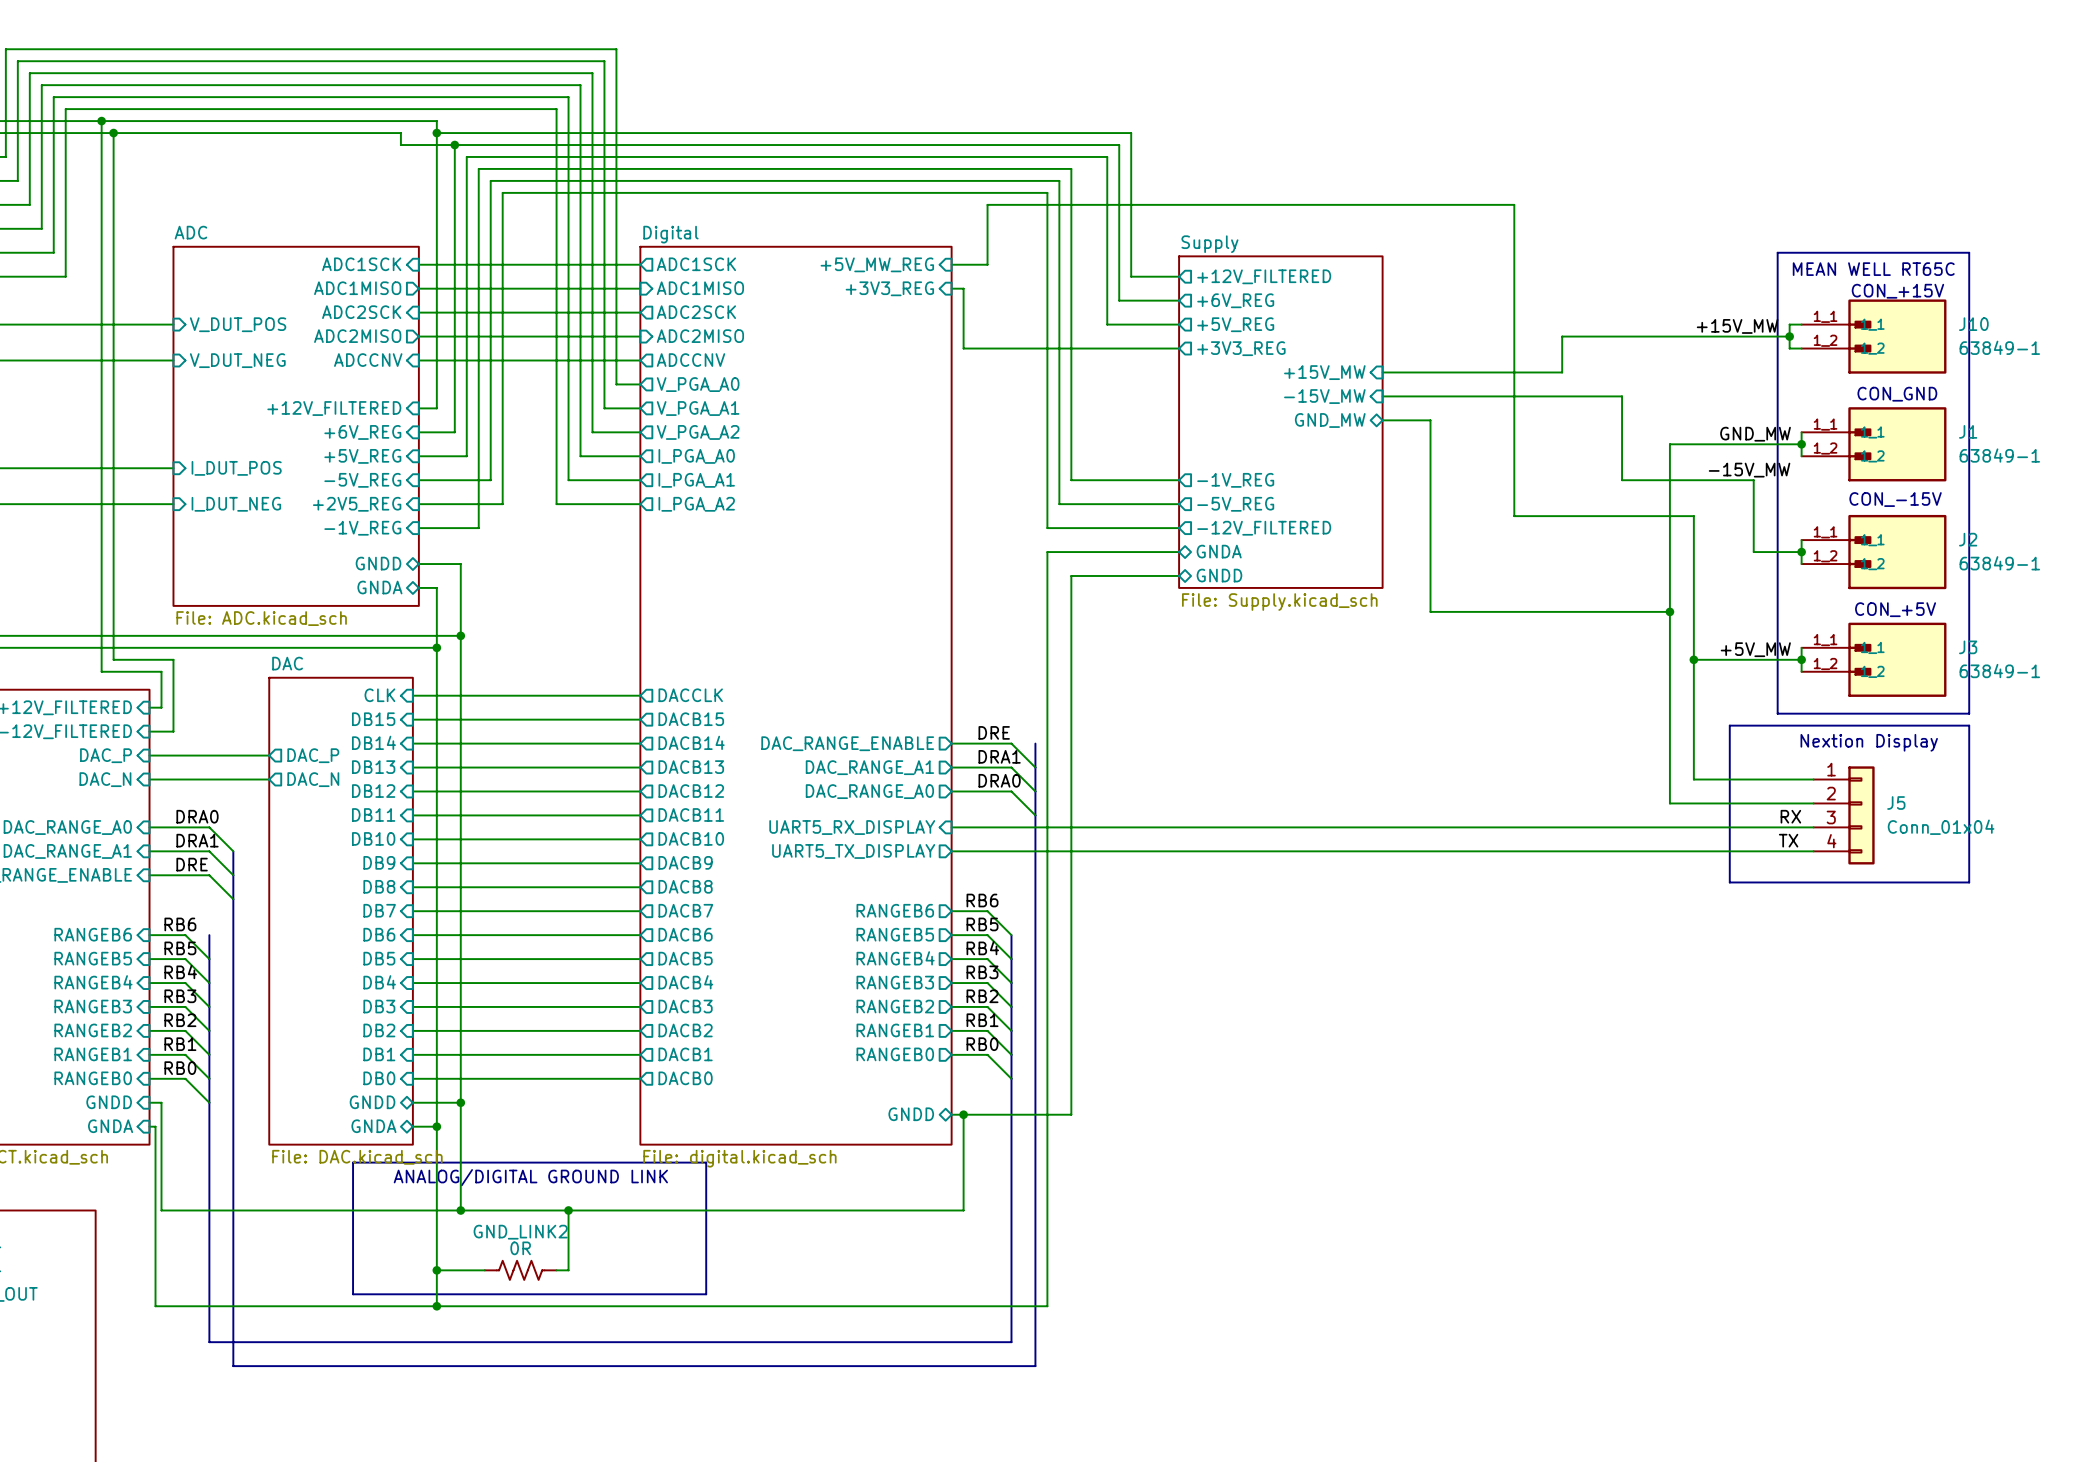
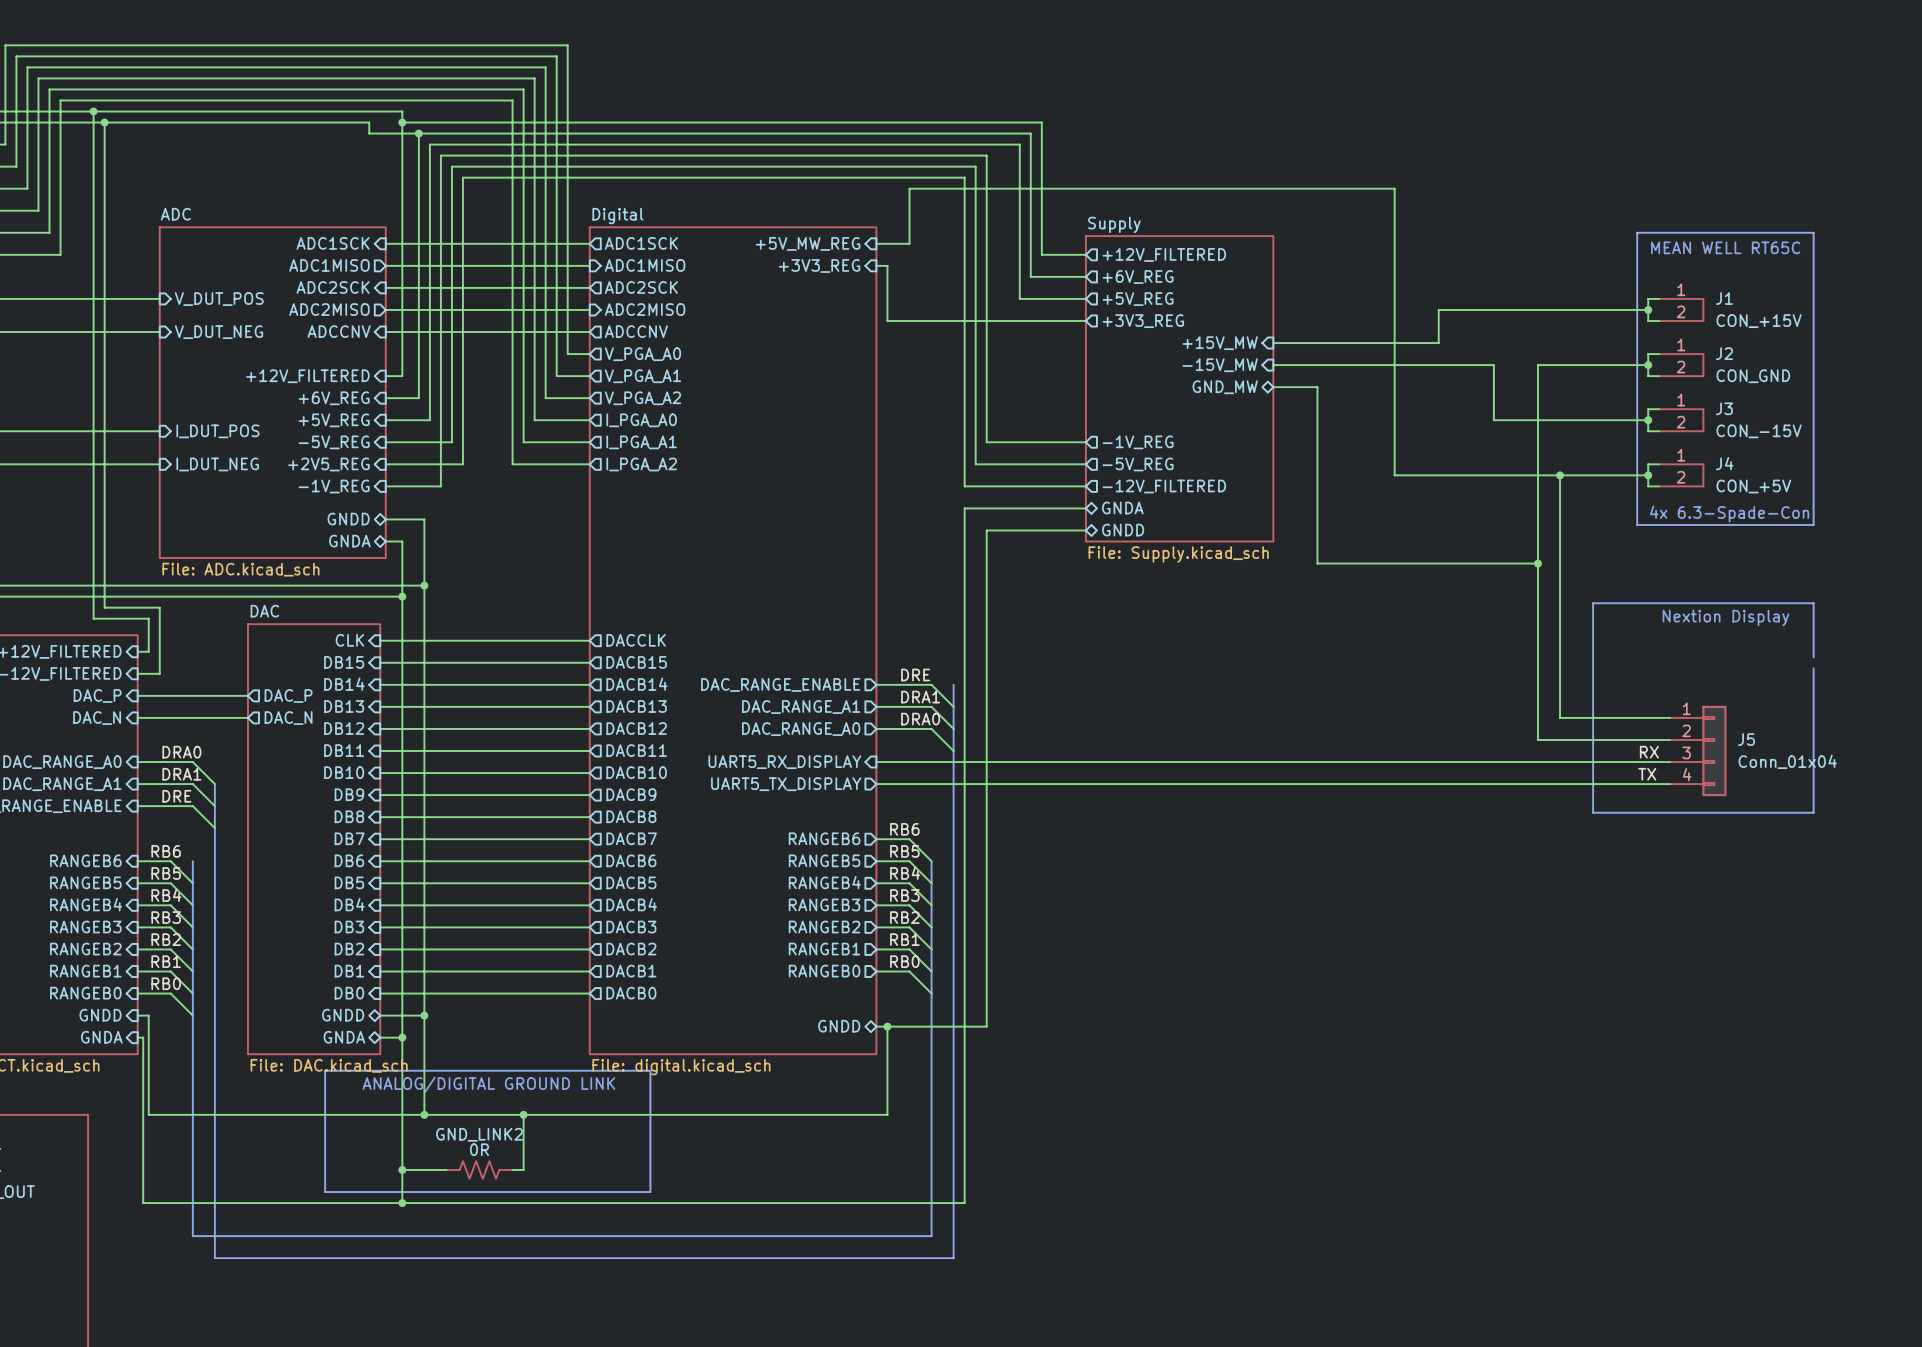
text: CON_+15V (1897, 291) -> none
label: +15V_MW (1737, 326) -> none
J10: 63849-1 (1874, 336) -> none
wire: none -> (1659, 354) (1648, 354) (1648, 376) (1659, 376)
text: CON_GND (1897, 394) -> none
junction: none -> (1648, 365)
J1 symbol: [1801, 407, 1947, 482] -> [1659, 298, 1704, 321]
J1 name position: J1 (1968, 431) -> J1 (1724, 298)
wire: (1801, 432) (1801, 456) -> none
label: GND_MW (1755, 434) -> none
wire: (1669, 444) (1789, 444) -> (1537, 409) (1537, 365) (1648, 365)
wire: none -> (1648, 409) (1648, 431) (1659, 431)
junction position: (1801, 444) -> (1648, 420)
J1 value: 63849-1 (1999, 455) -> CON_+15V (1759, 321)
wire: (1622, 456) (1622, 480) (1753, 480) (1753, 552) (1801, 552) -> (1493, 420) (1648, 420)
label: -15V_MW (1749, 470) -> none
text: CON_-15V (1895, 499) -> none
wire: none -> (1659, 464) (1648, 464) (1648, 486) (1659, 486)
J2 symbol: [1801, 514, 1947, 590] -> [1659, 354, 1704, 377]
wire: none -> (1560, 475) (1648, 475)
junction: none -> (1560, 475)
junction: none -> (1648, 475)
J4: none -> CON_+5V (1681, 475)
J2 name position: J2 (1968, 539) -> J2 (1724, 353)
wire: (1801, 540) (1801, 564) -> none
junction: (1801, 552) -> none
text: none -> 4x 6.3-Spade-Con (1729, 514)
J2 value: 63849-1 (1999, 563) -> CON_GND (1753, 376)
line: (1777, 570) (1777, 713) (1969, 713) -> (1637, 524) (1813, 524)
line: (1969, 570) (1969, 655) -> none
text: CON_+5V (1895, 609) -> none
J3 symbol: [1801, 622, 1947, 697] -> [1659, 409, 1704, 432]
wire: (1801, 647) (1801, 671) -> none
J3 name position: J3 (1968, 647) -> J3 (1724, 408)
label: +5V_MW (1755, 649) -> none
wire: (1693, 659) (1801, 659) -> none
junction: (1693, 659) -> none
junction: (1801, 659) -> none
J3 value: 63849-1 (1999, 671) -> CON_-15V (1759, 431)
line: (1729, 725) (1969, 725) -> (1593, 668) (1593, 603) (1813, 603)
text position: Nextion Display (1869, 742) -> Nextion Display (1725, 617)

